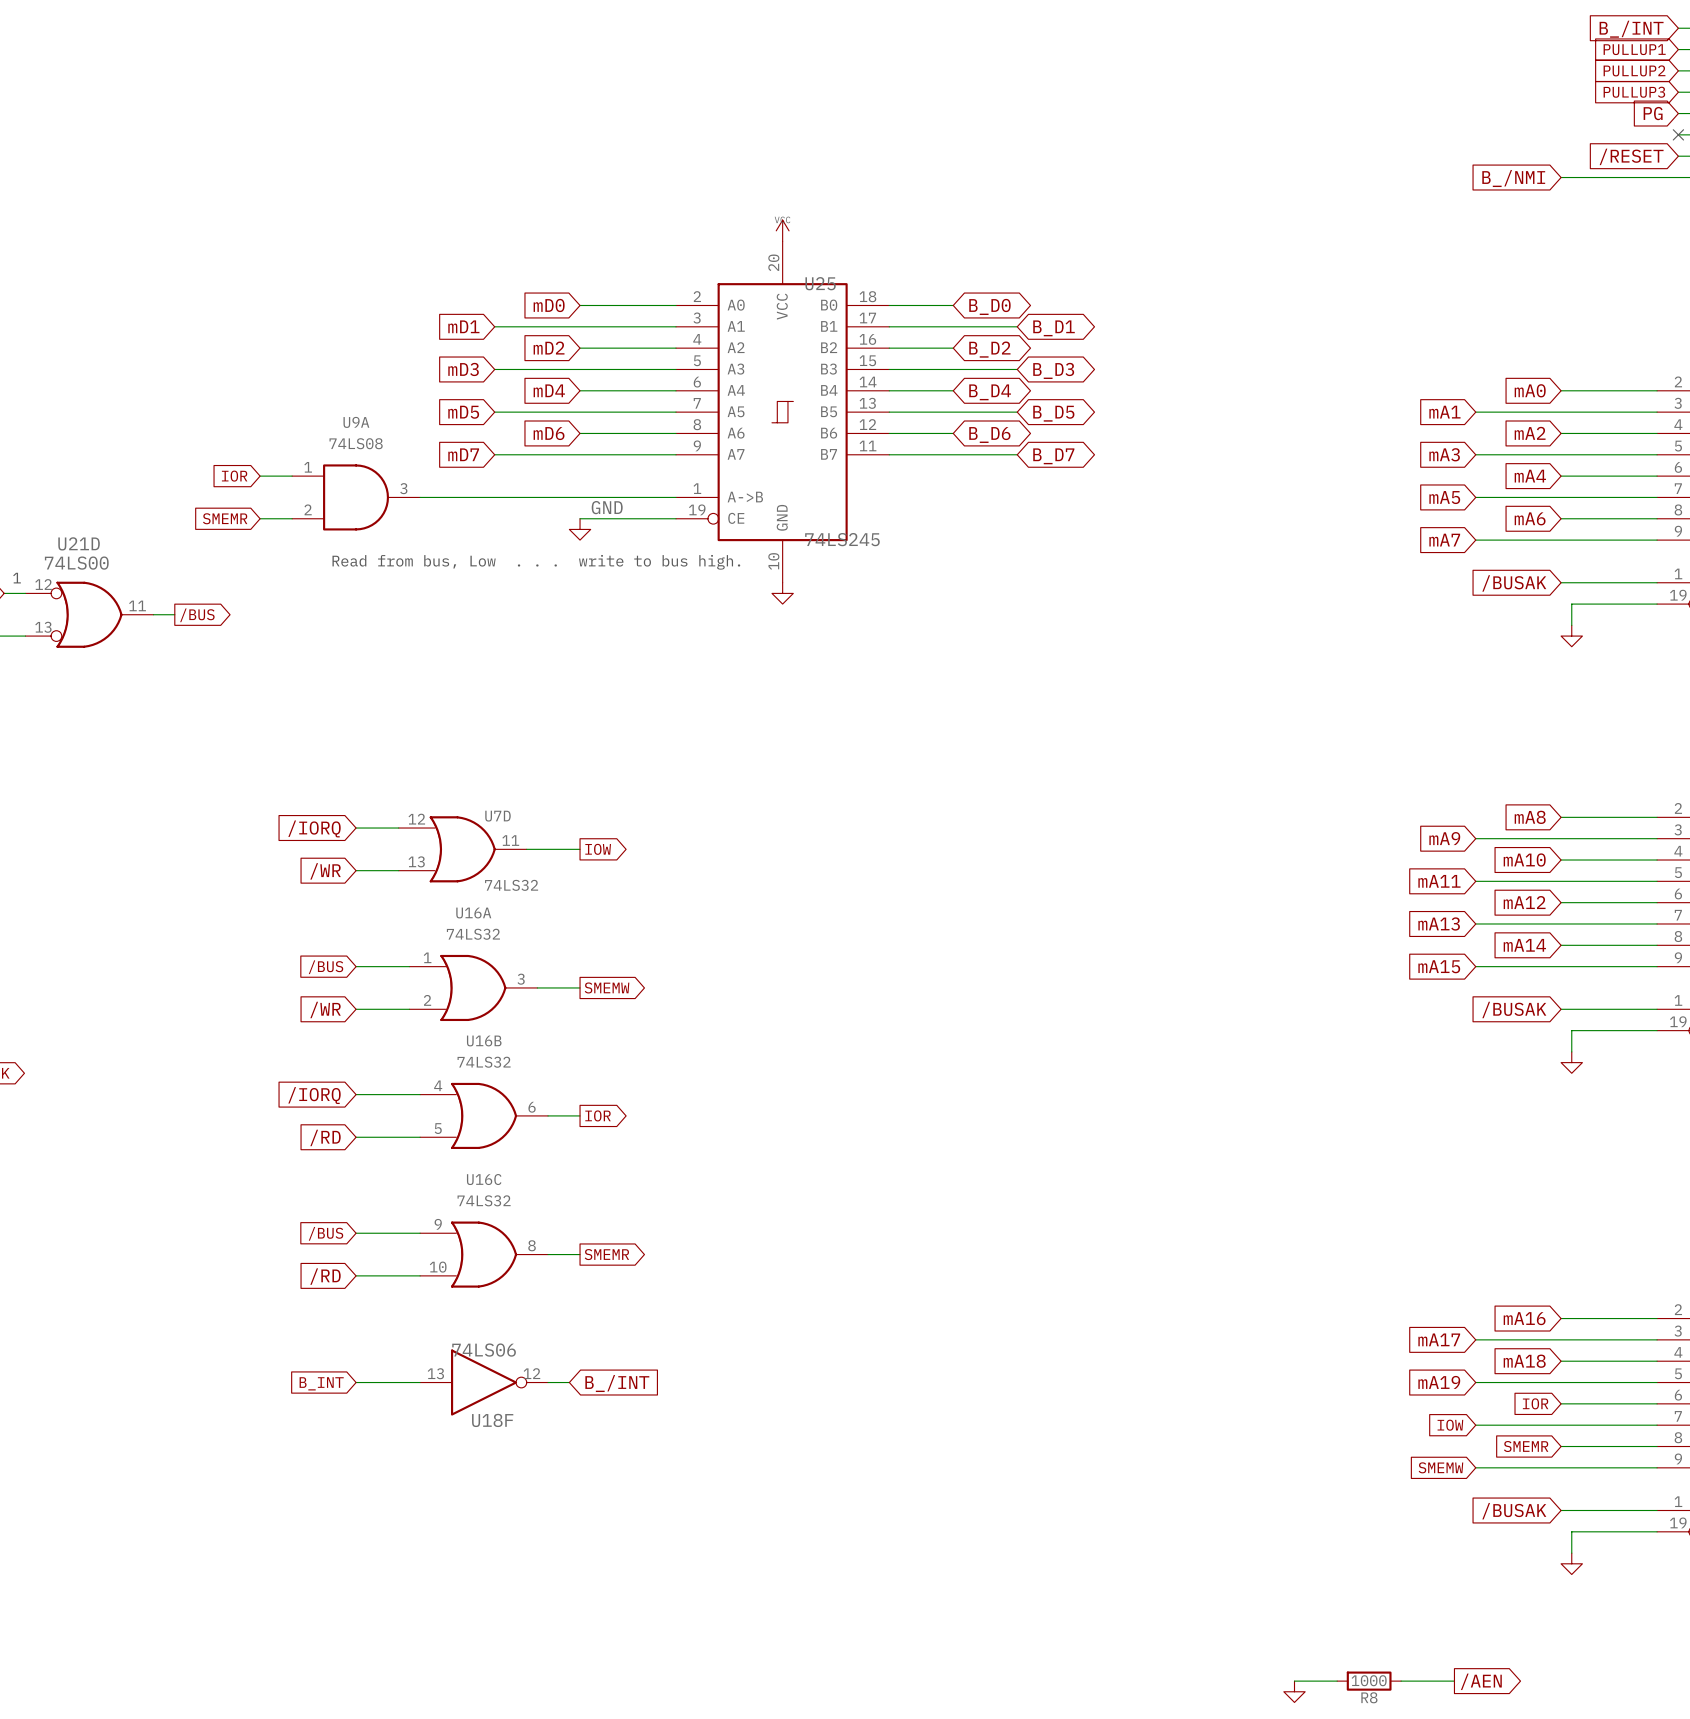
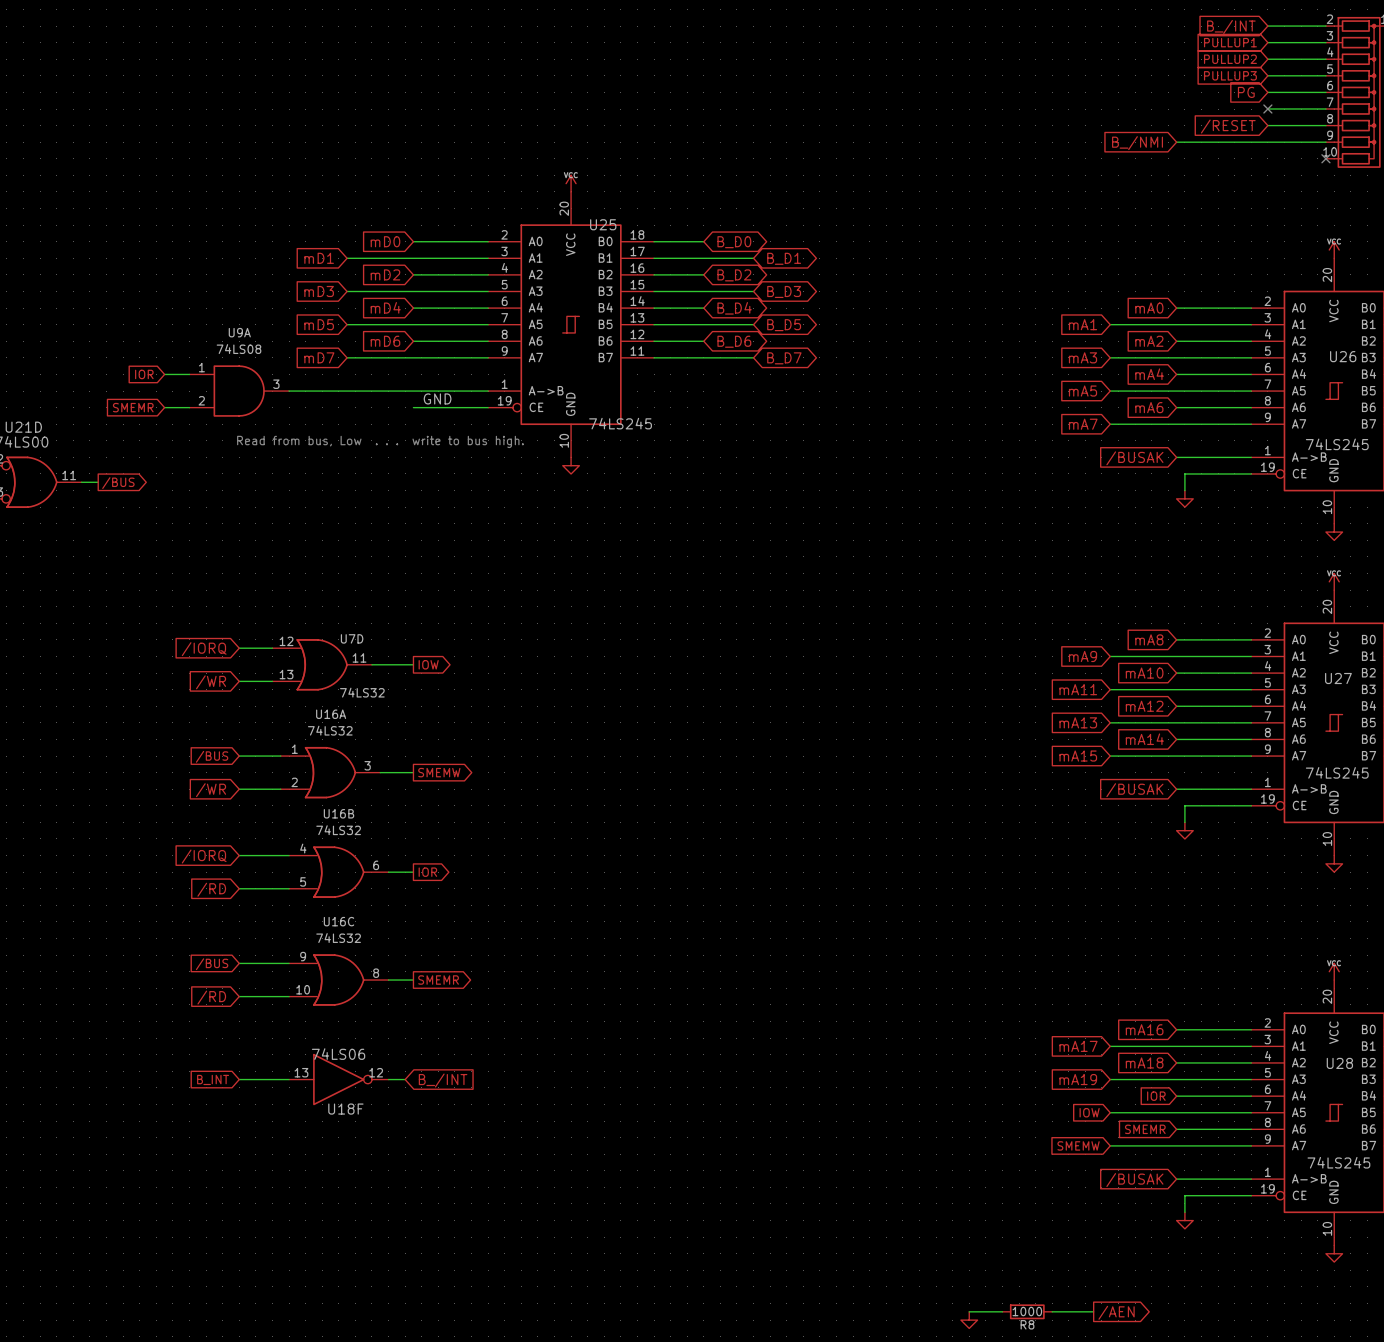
power symbol: (580, 529) -> none

